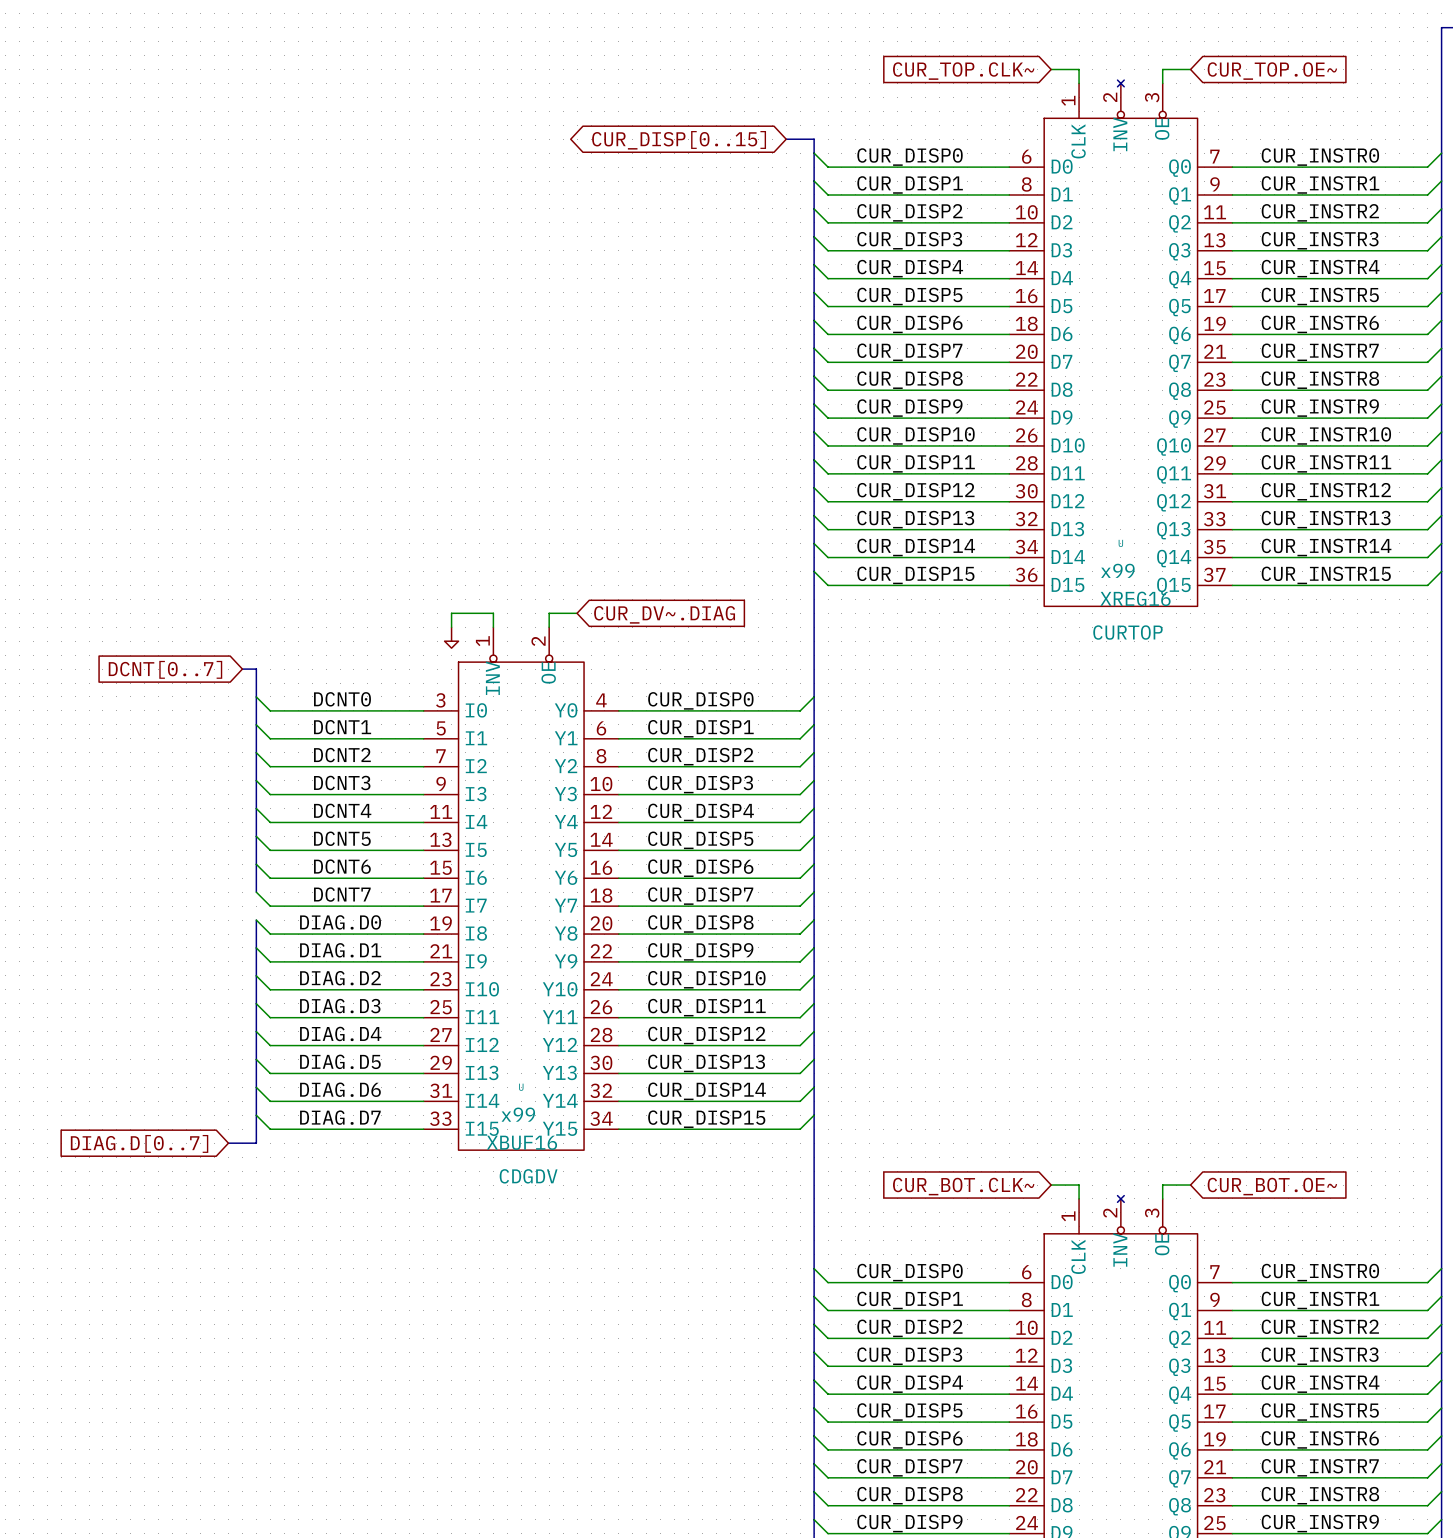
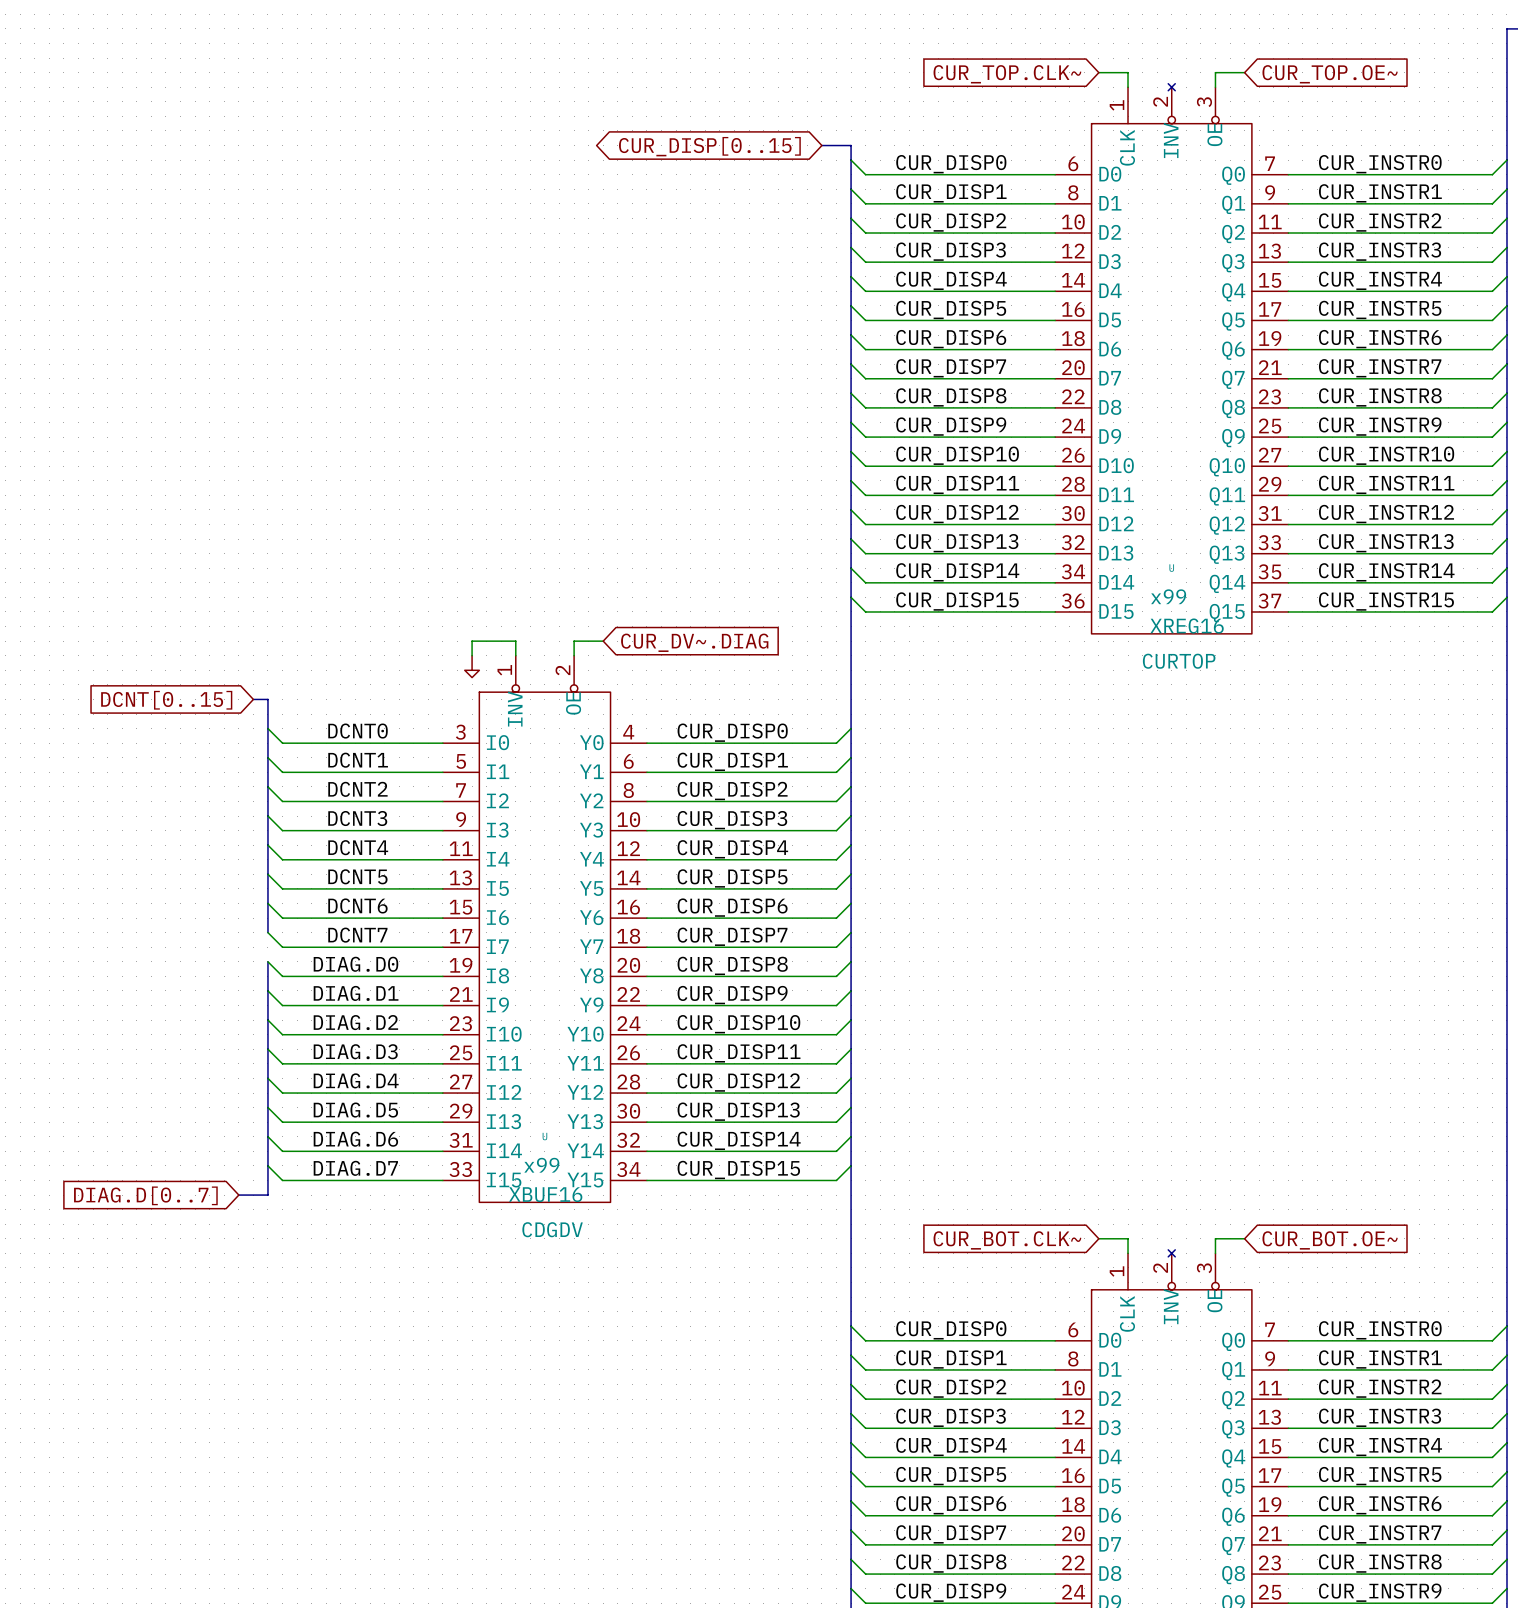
global label: DCNT[0..7] (165, 669) -> DCNT[0..15] (166, 700)

